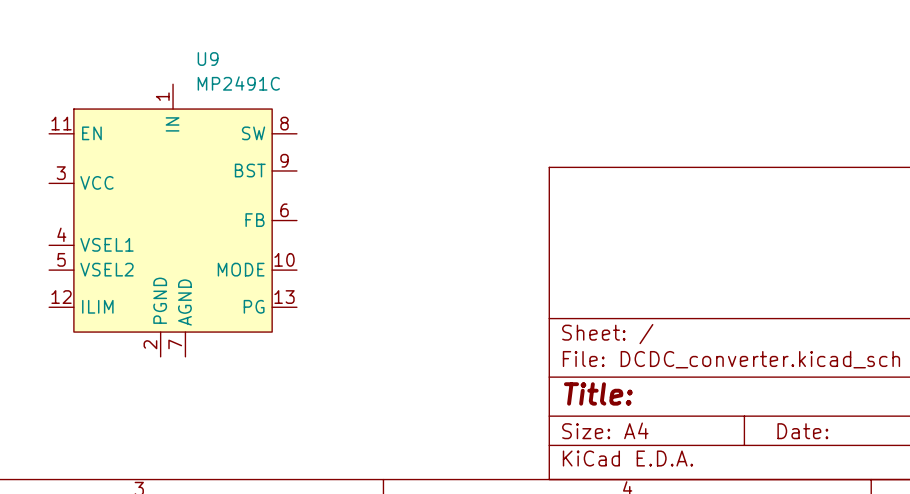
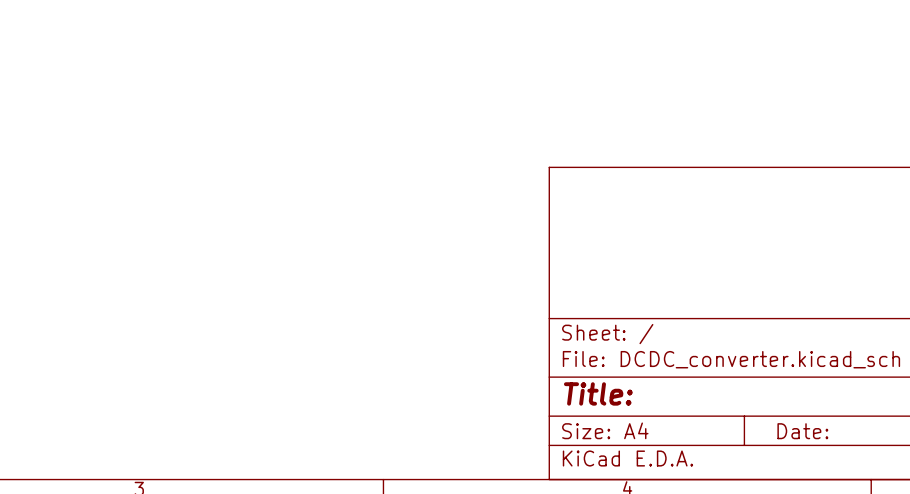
U9: MP2491C (173, 220) -> none

